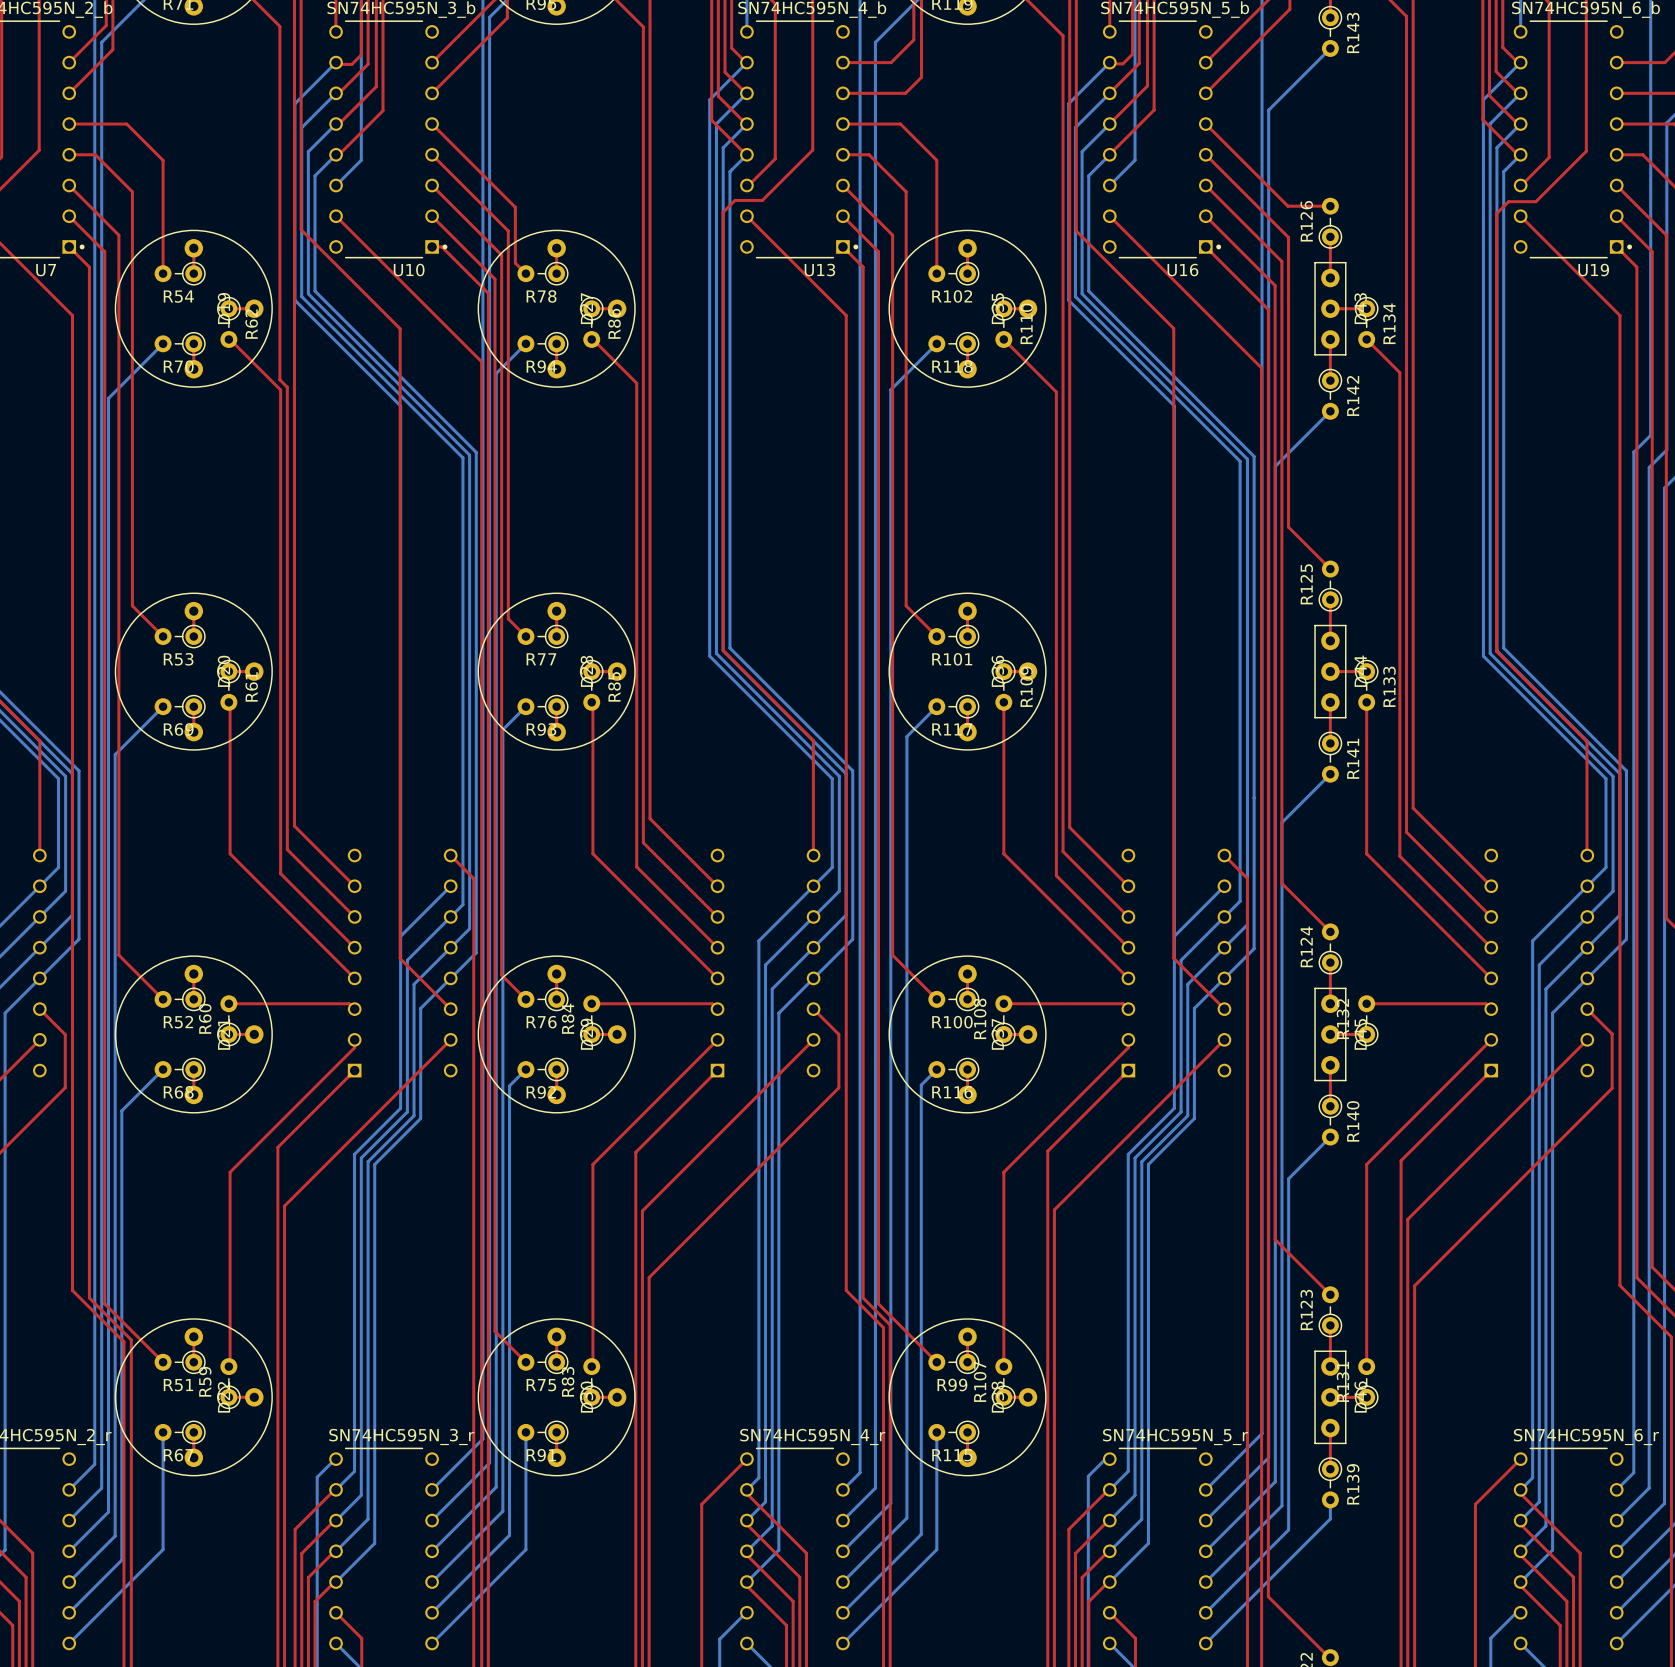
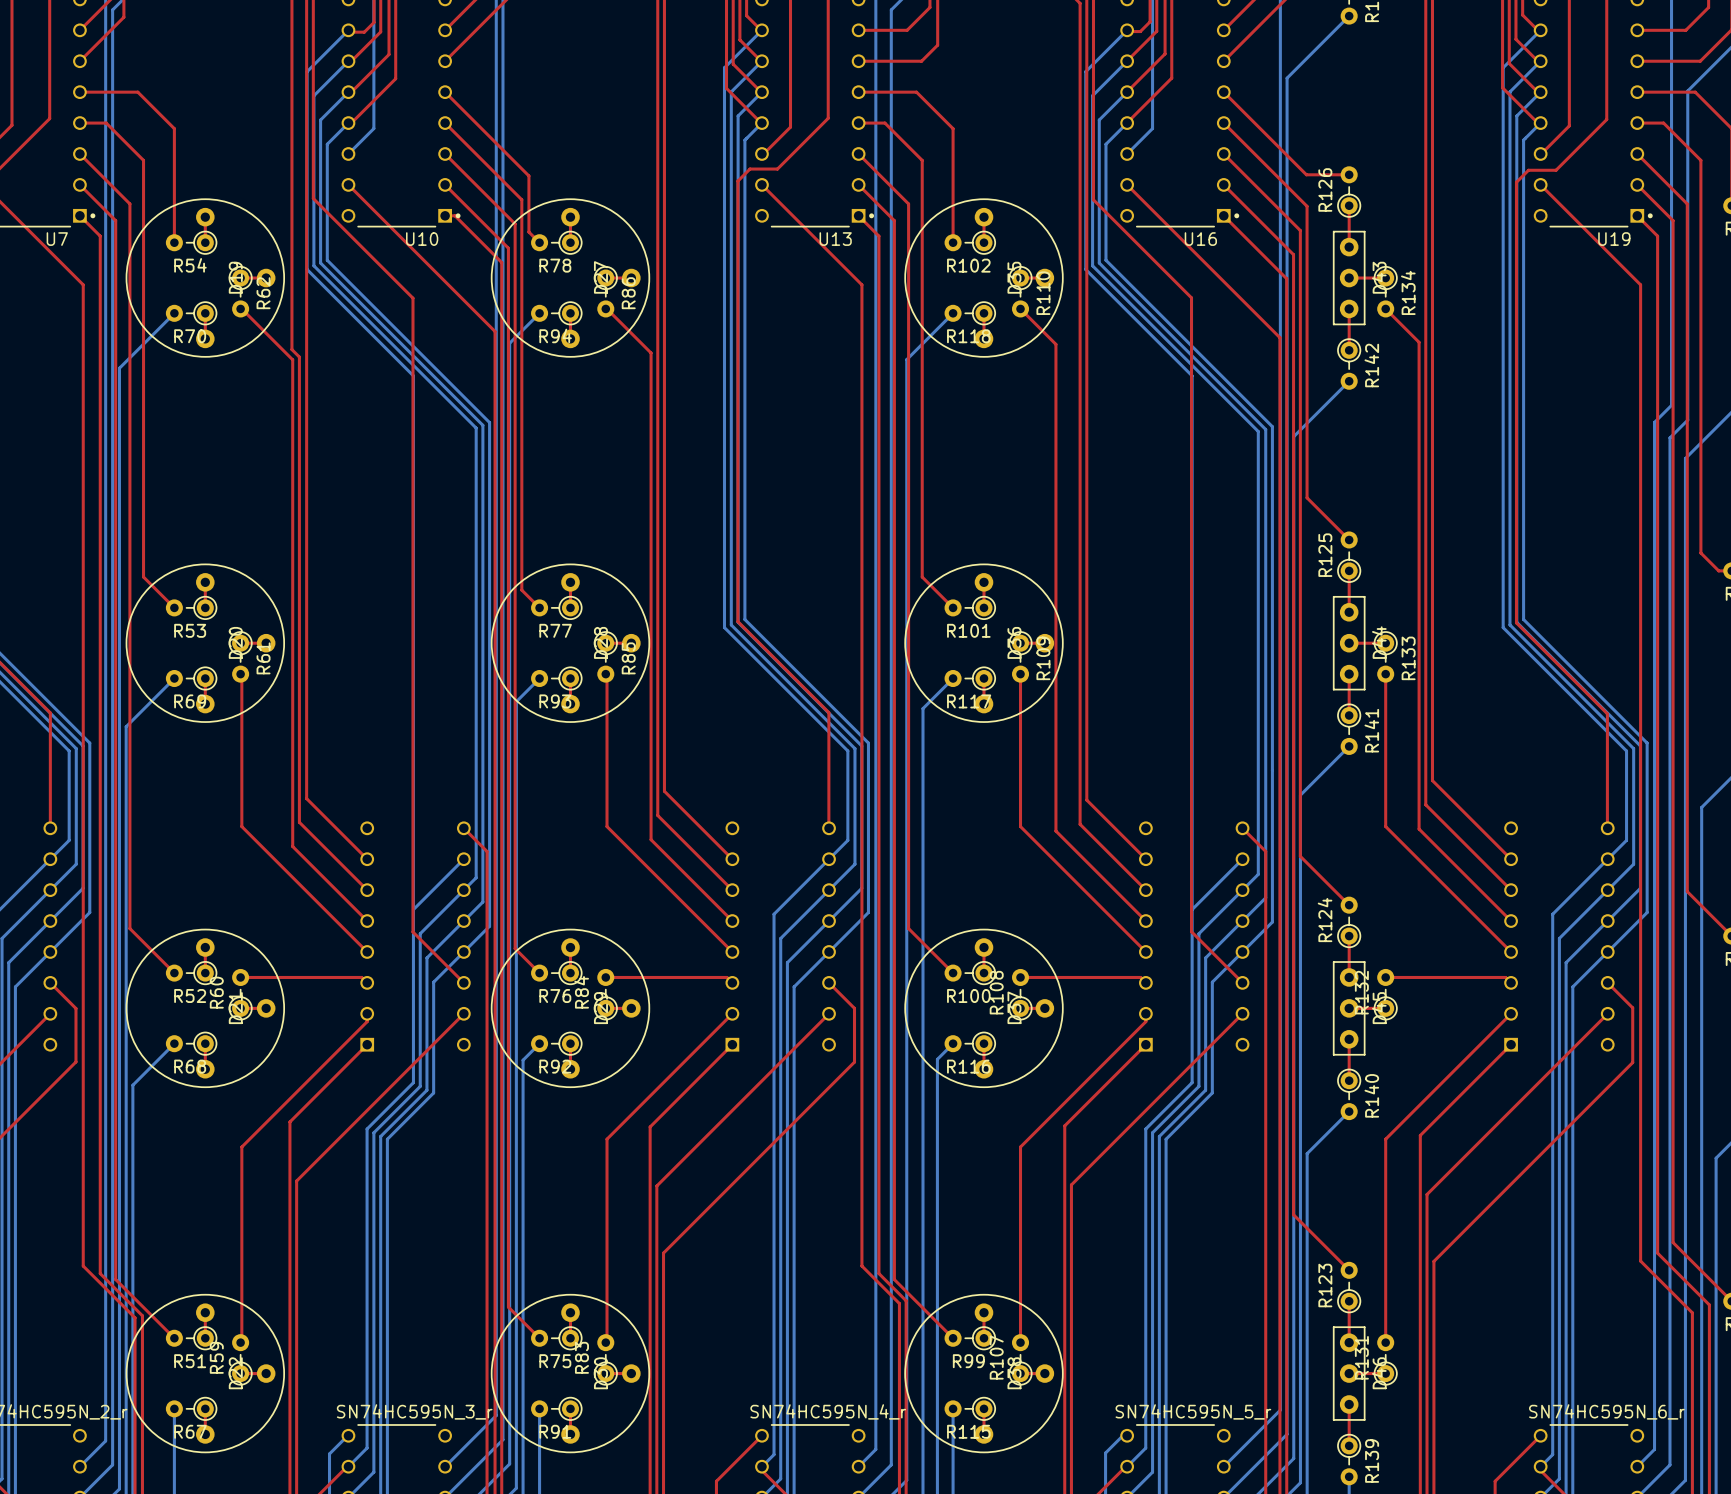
top track: (1039, 374) (1056, 392) (1056, 875) -> (1055, 344) (1055, 831) (1073, 848)

